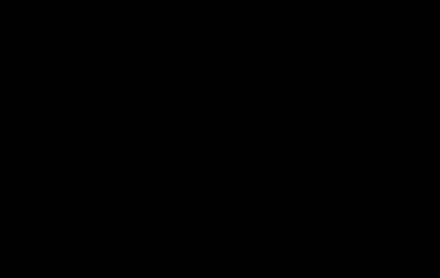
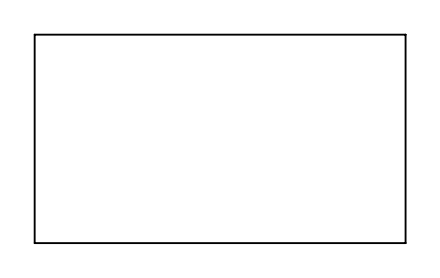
board edge: none -> (405, 34) (34, 34) (34, 243) (405, 243) (405, 34)

